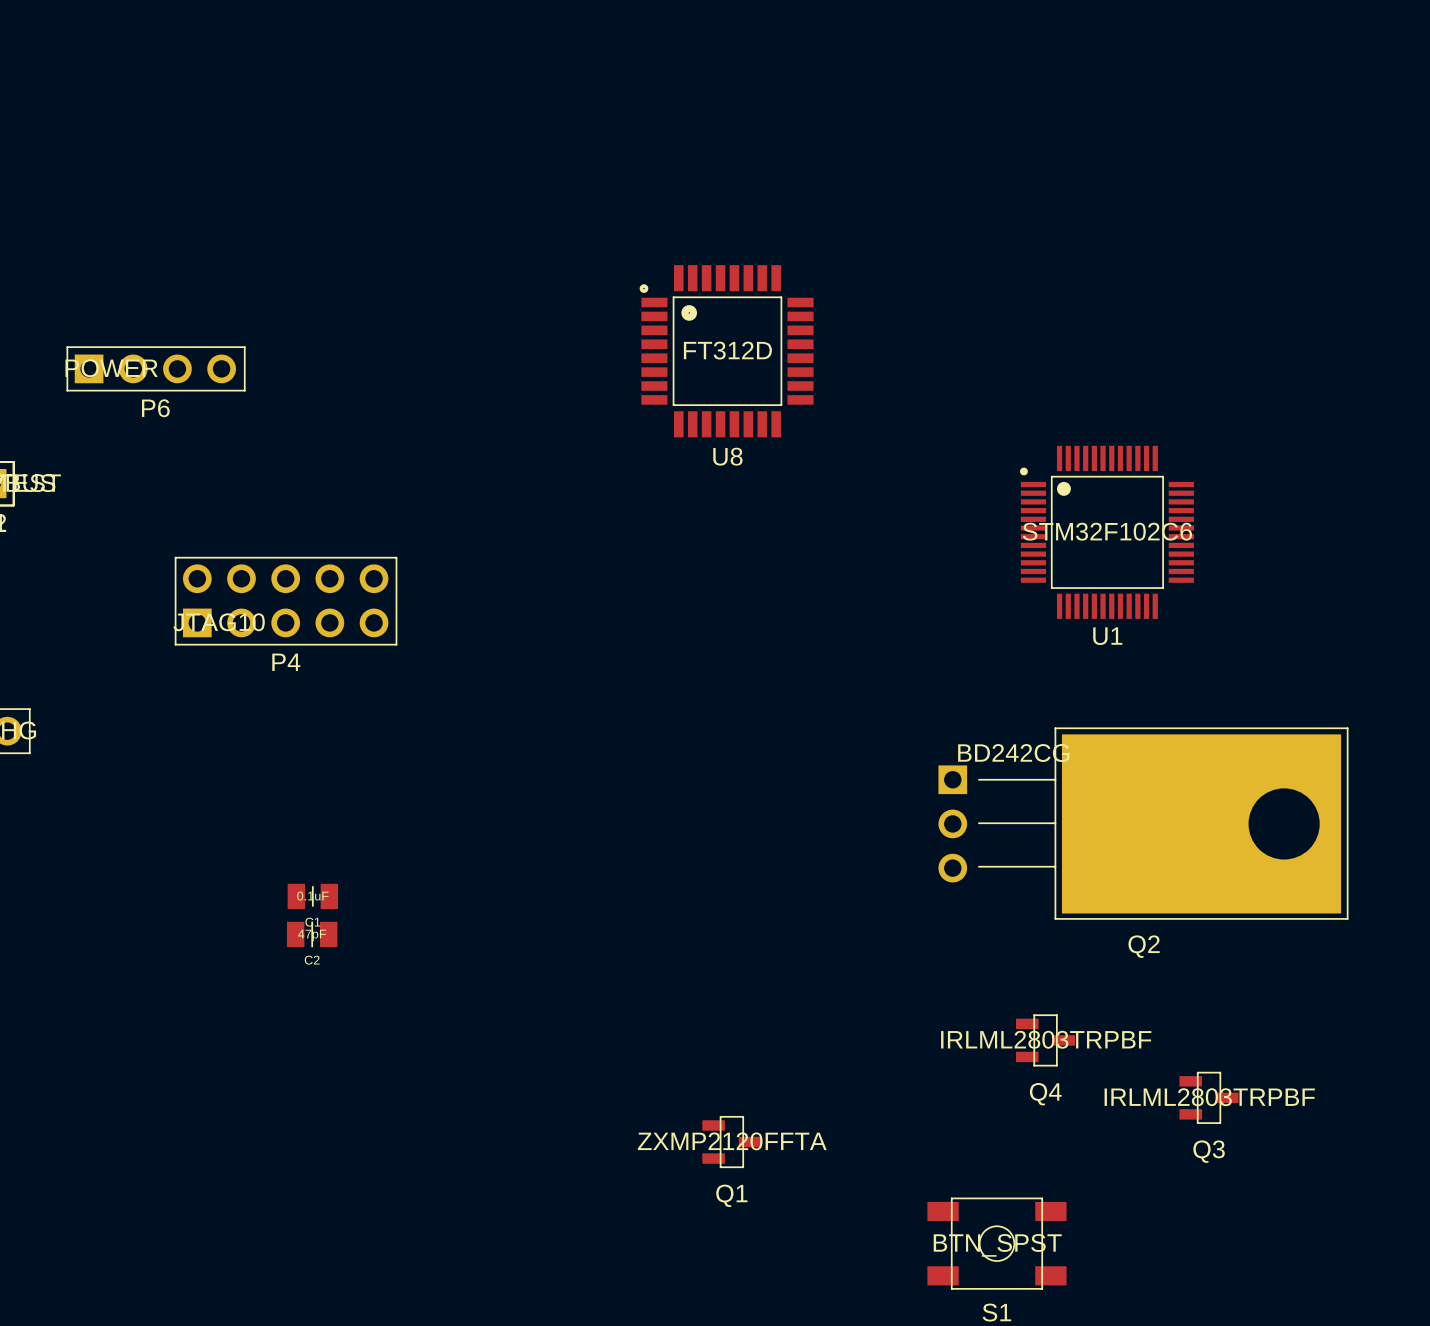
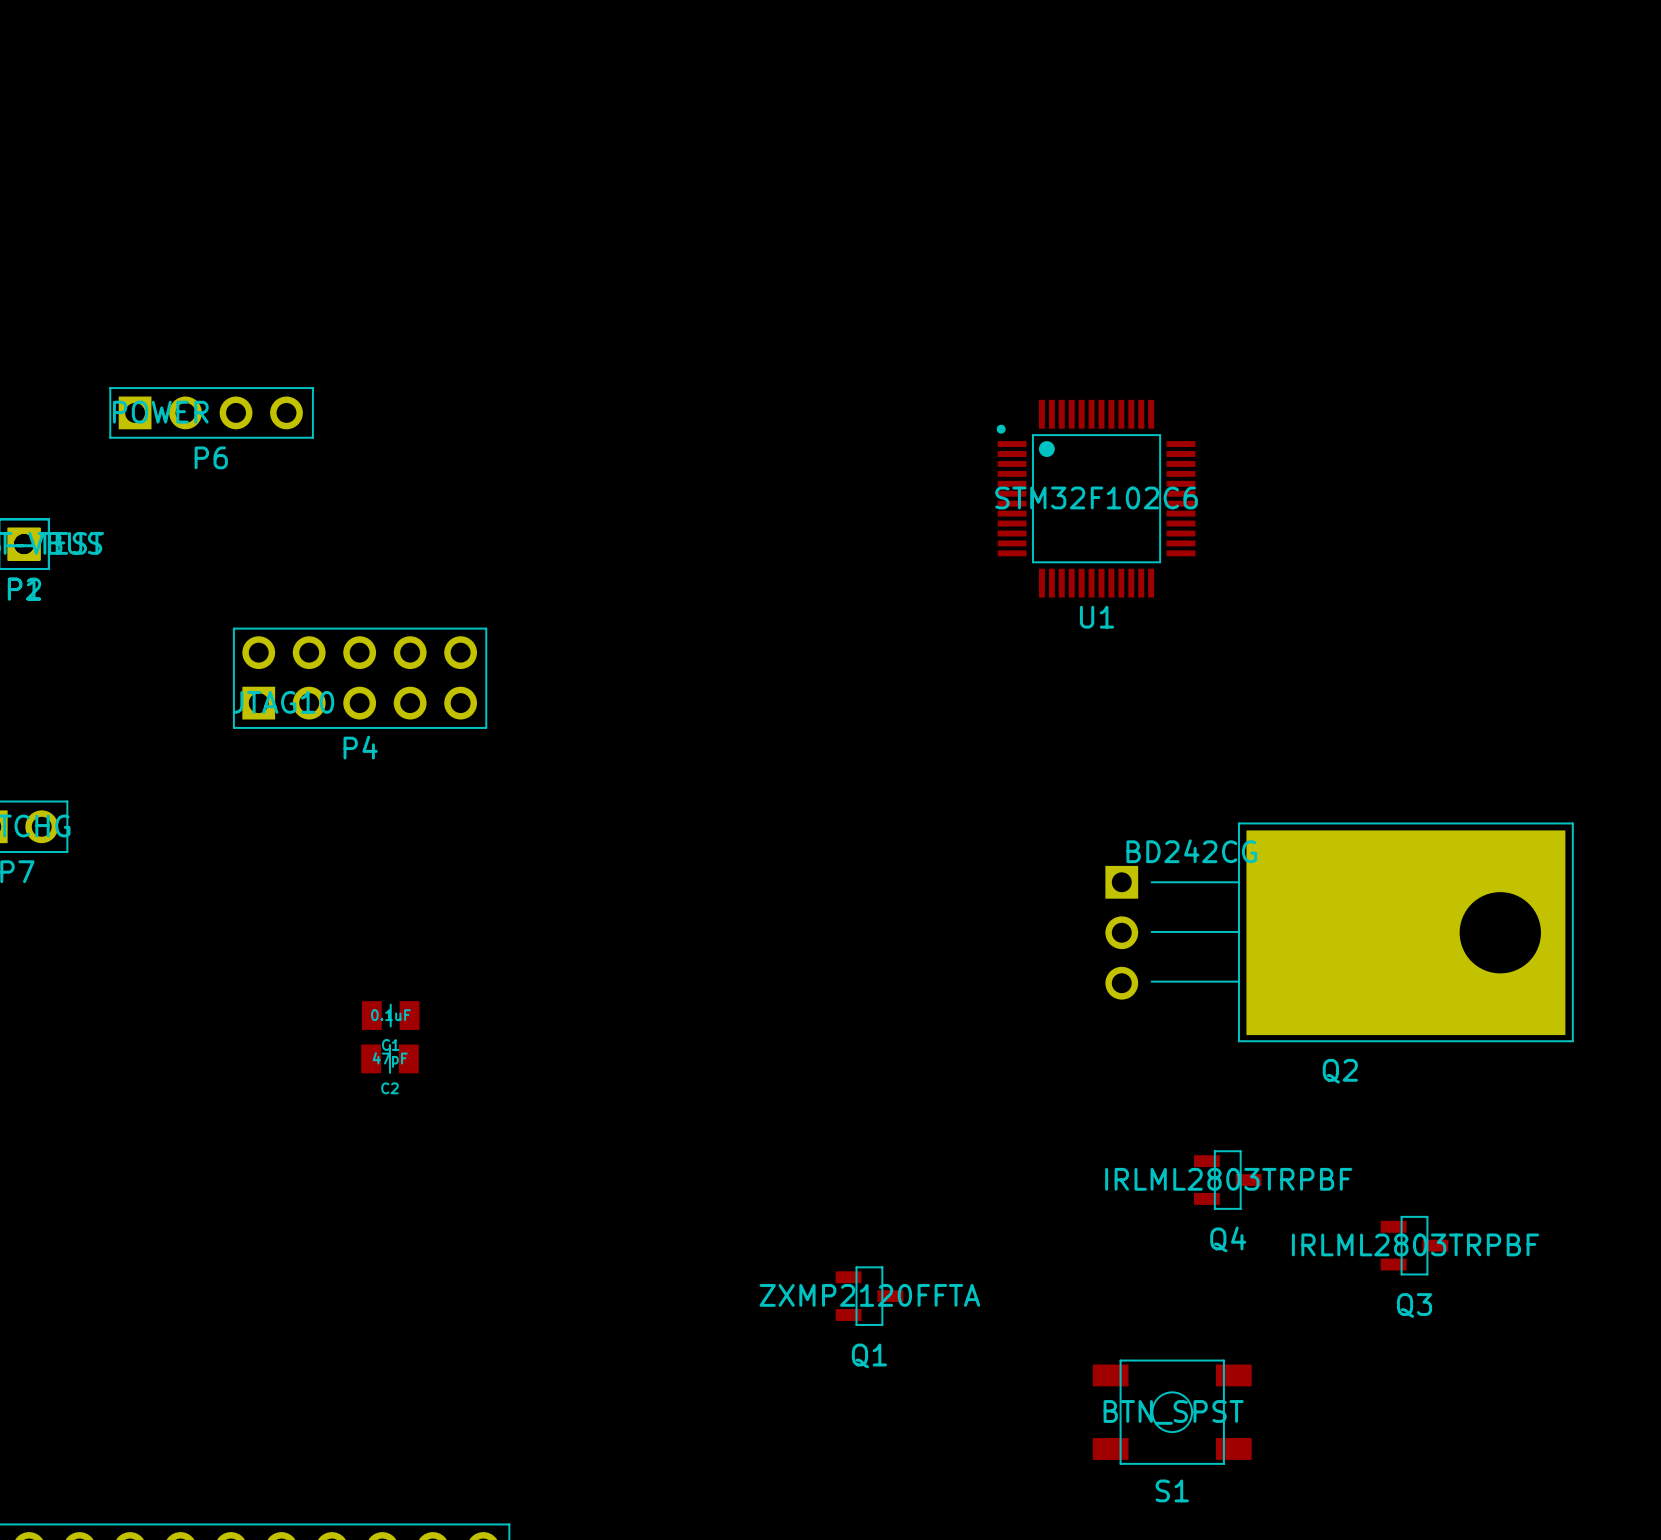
U8: FT312D (726, 351) -> none
U1 position: (1106, 532) -> (1096, 498)

